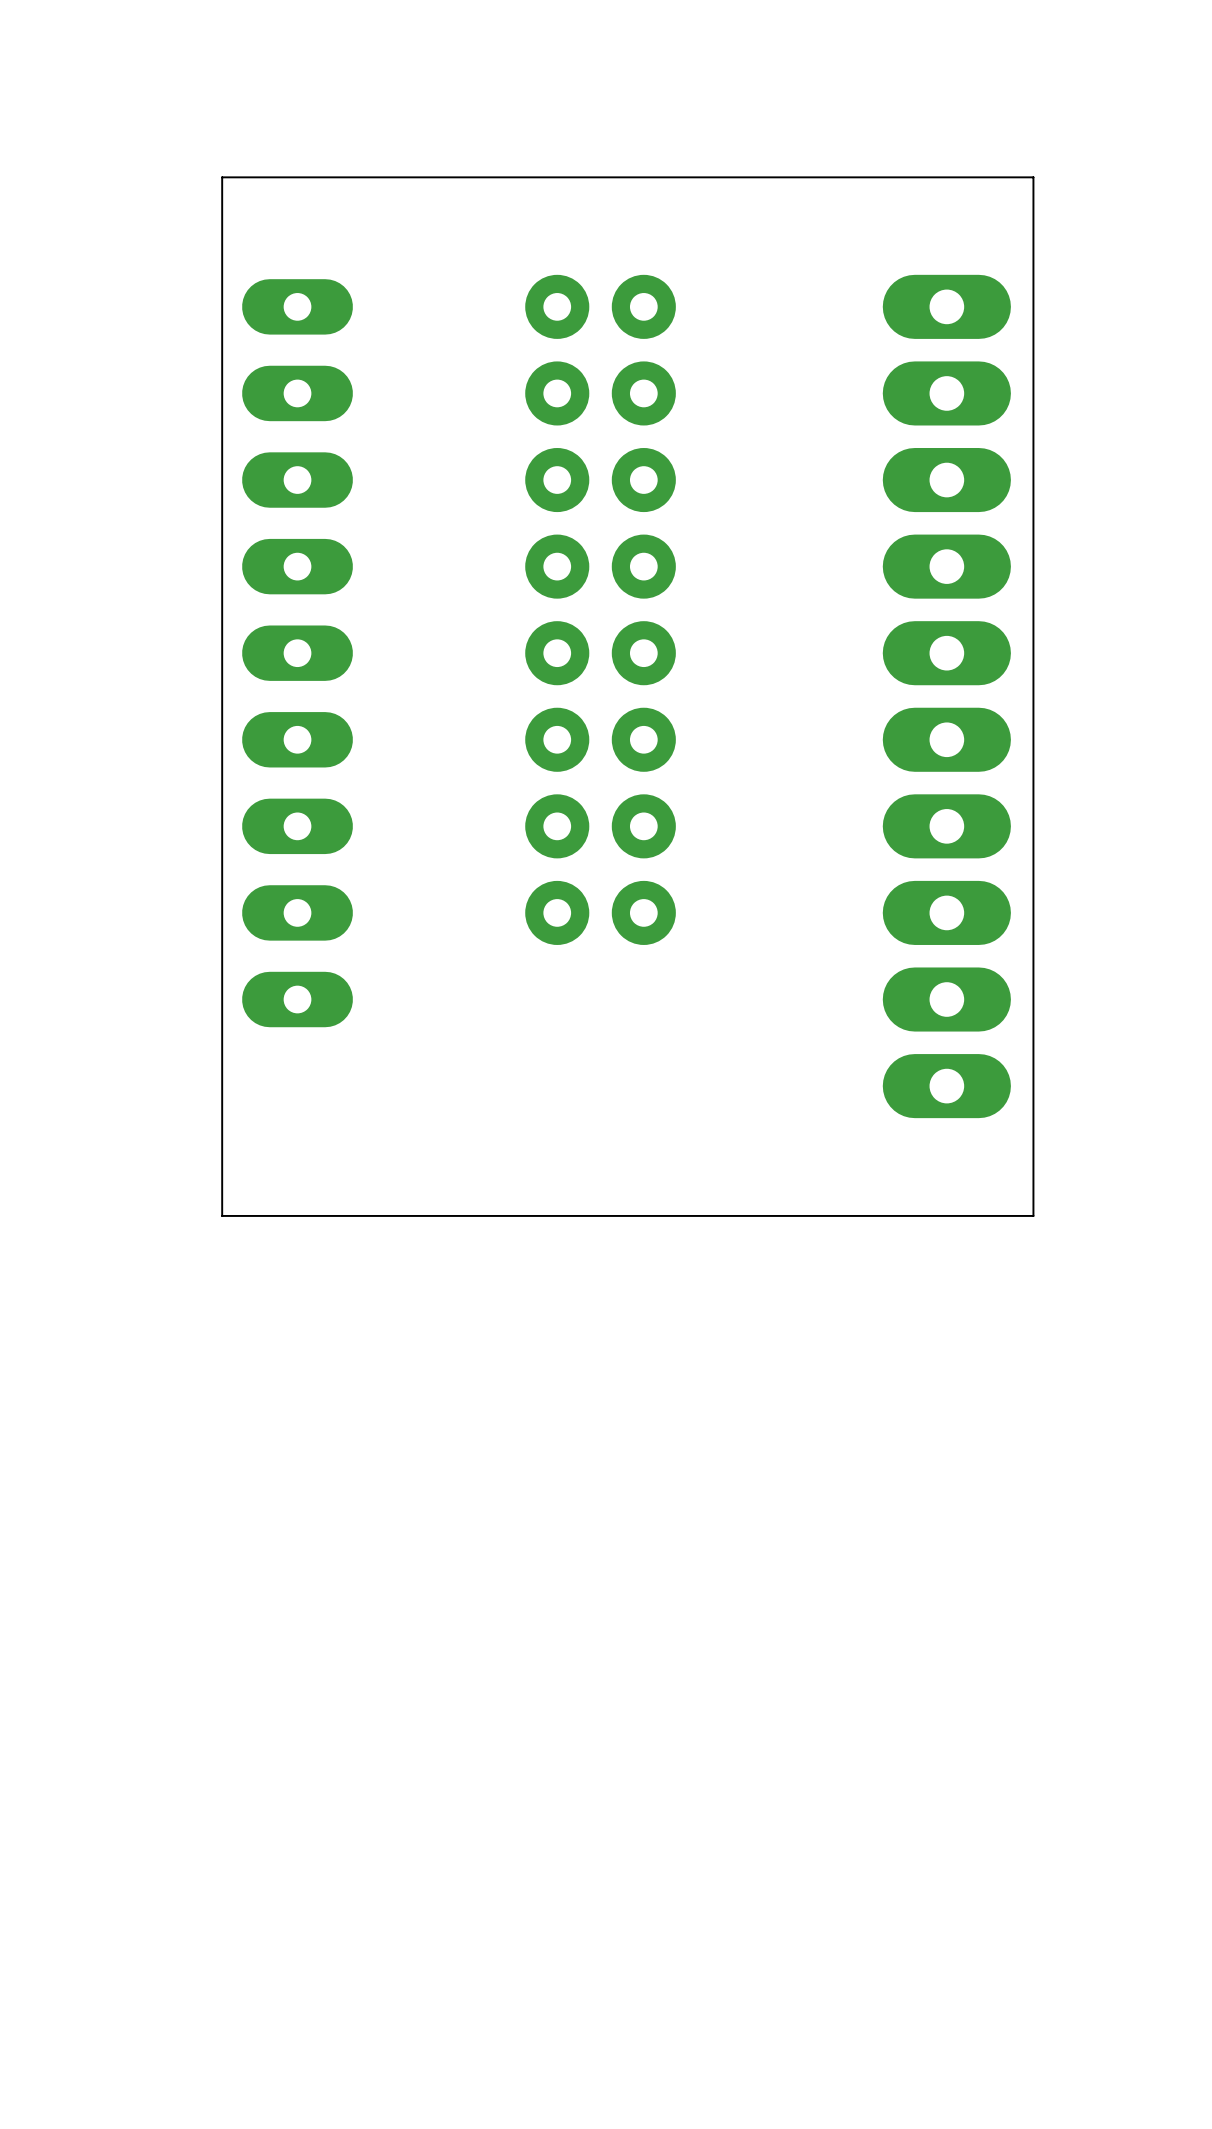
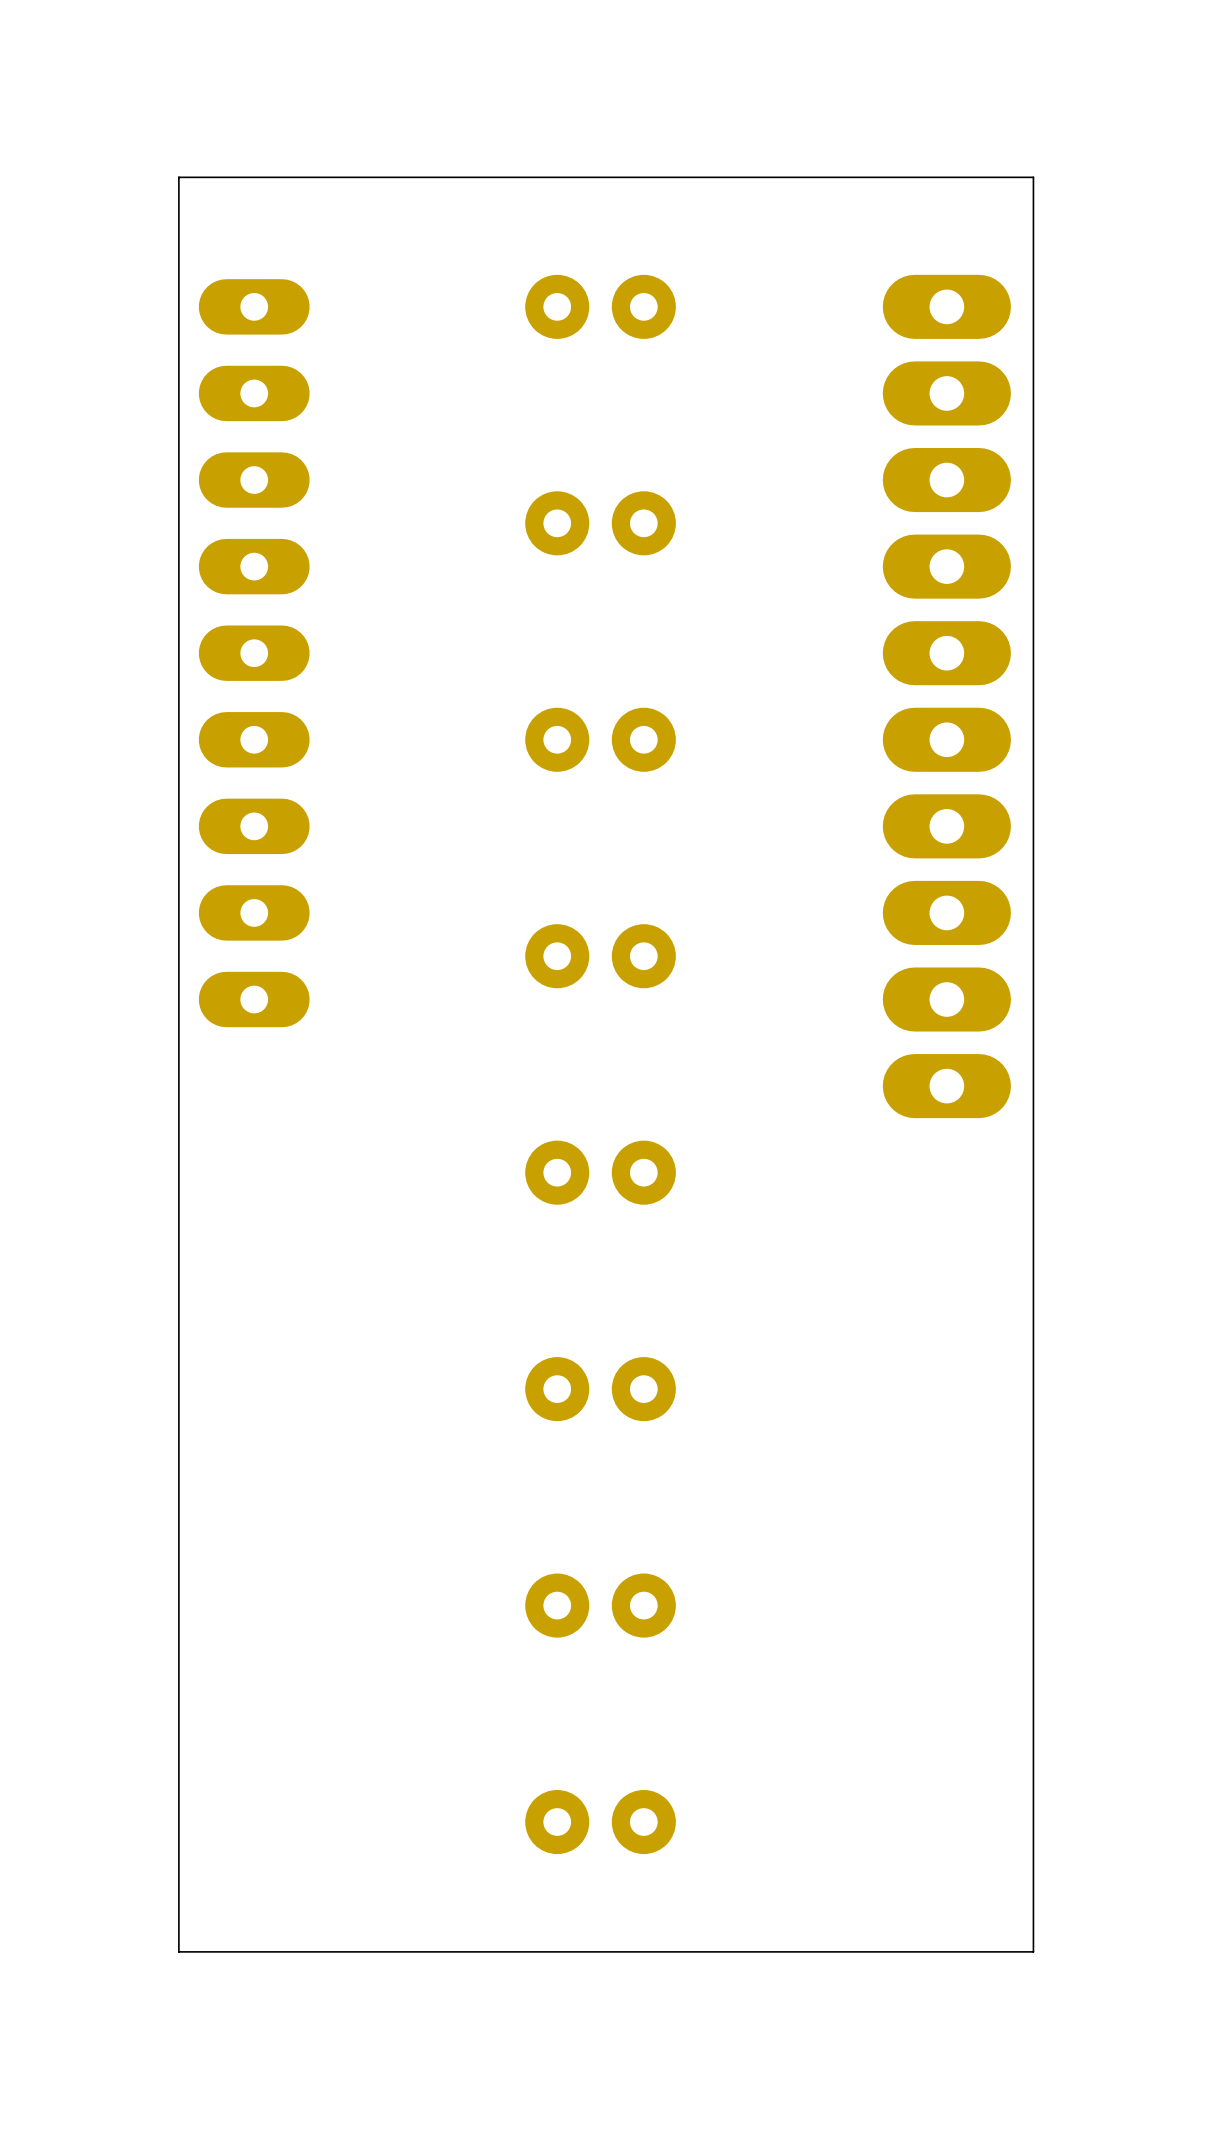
board edge: (222, 177) (222, 1215) (1033, 1215) -> (222, 177) (178, 177) (178, 1951) (1033, 1951) (1033, 1215)
part: (600, 393) -> none
part: (600, 480) -> none
part: none -> (600, 523)
part: (600, 566) -> none
part position: (297, 653) -> (254, 653)
part: (600, 653) -> none
part: (600, 826) -> none
part position: (600, 912) -> (600, 956)
part: none -> (600, 1172)
part: none -> (600, 1389)
part: none -> (600, 1605)
part: none -> (600, 1822)

